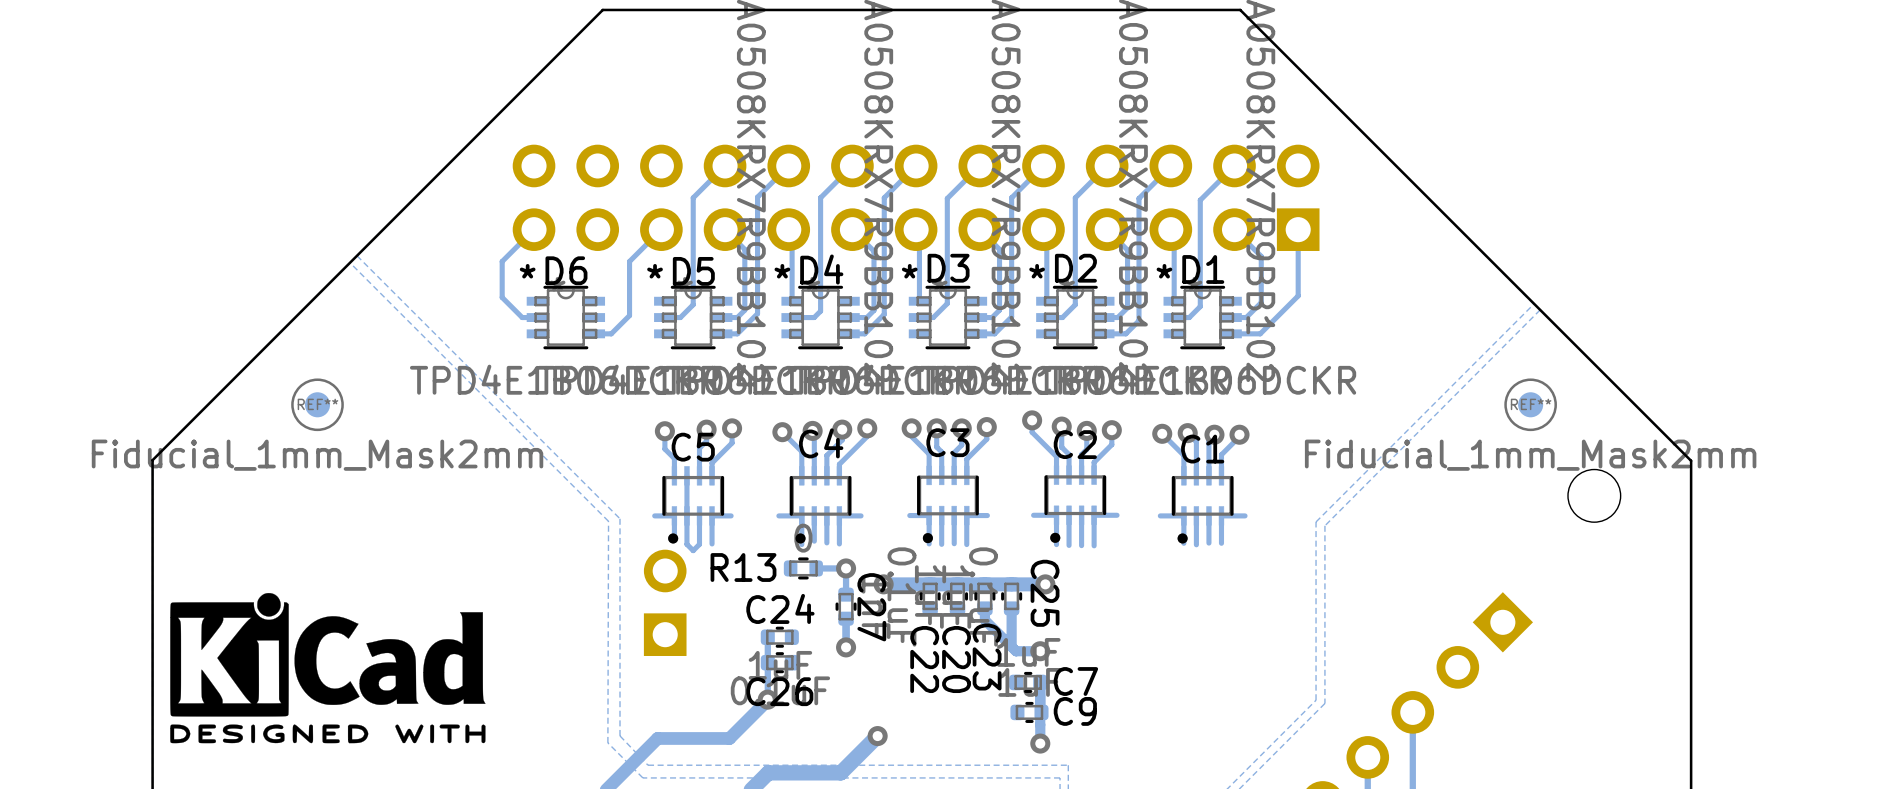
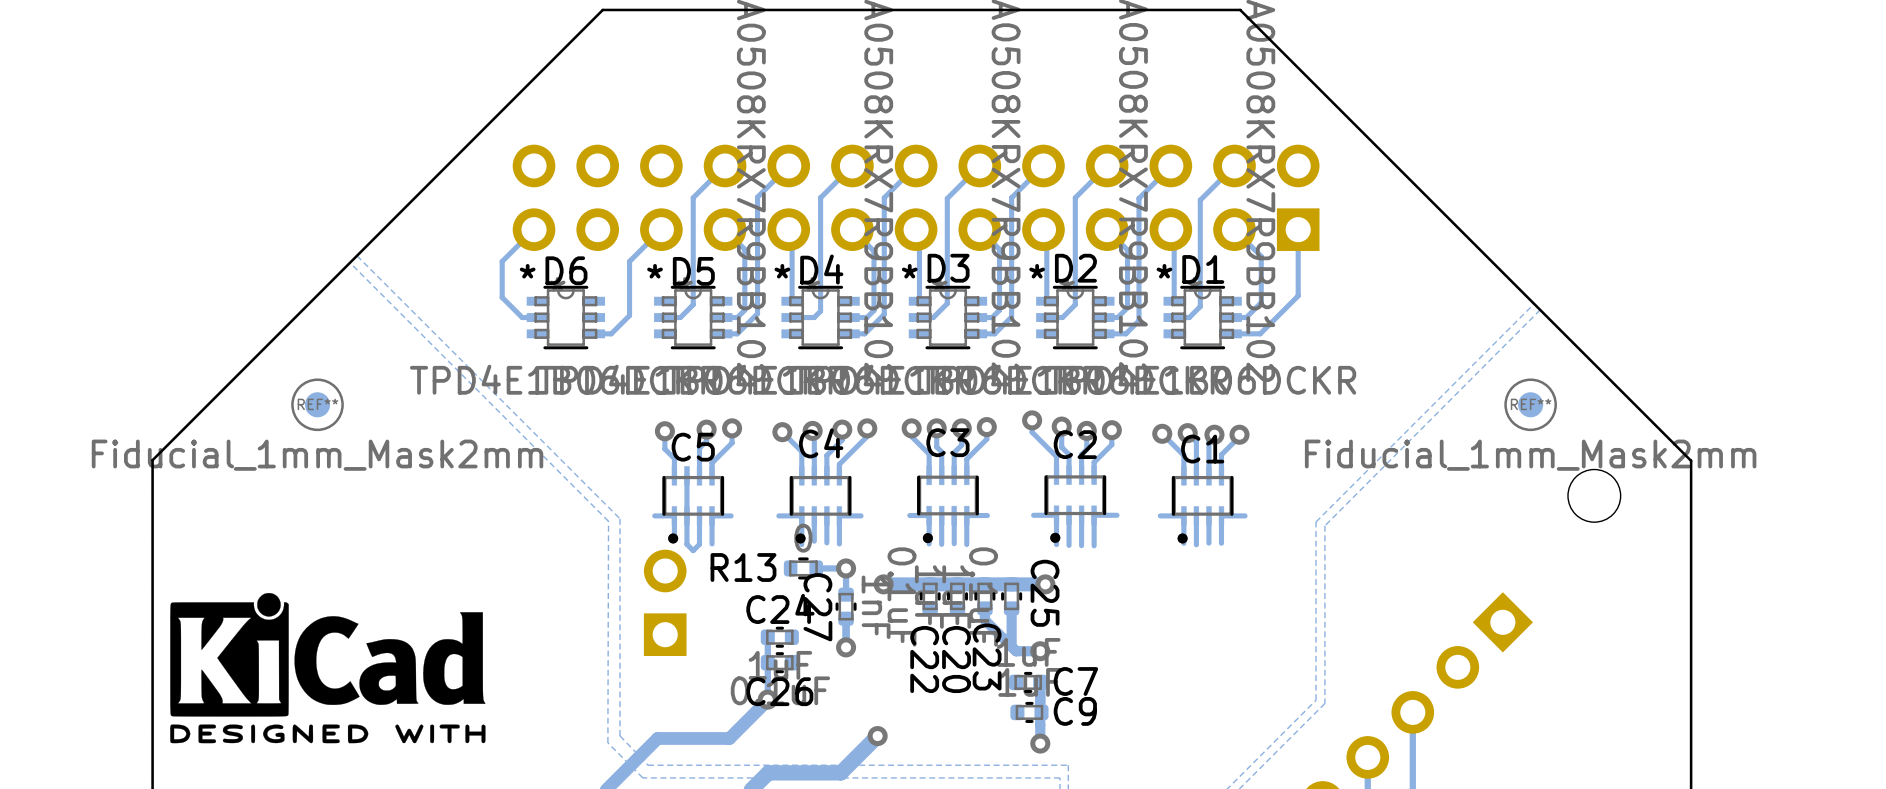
C27 name position: C27 (871, 607) -> C27 (817, 607)

